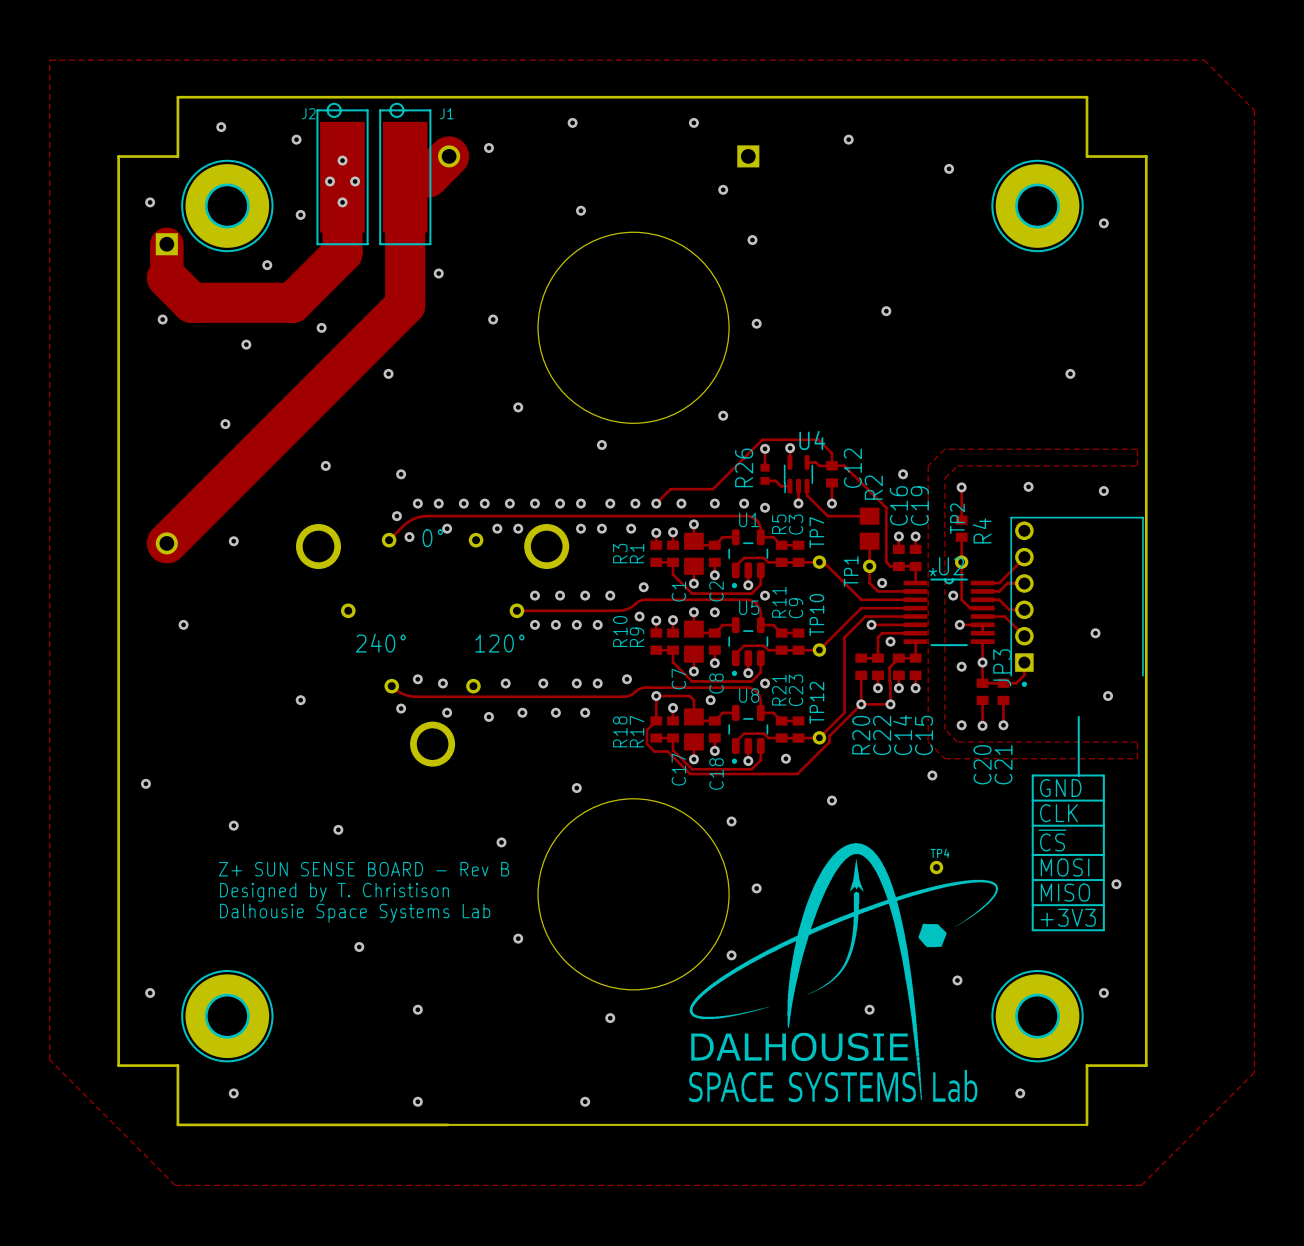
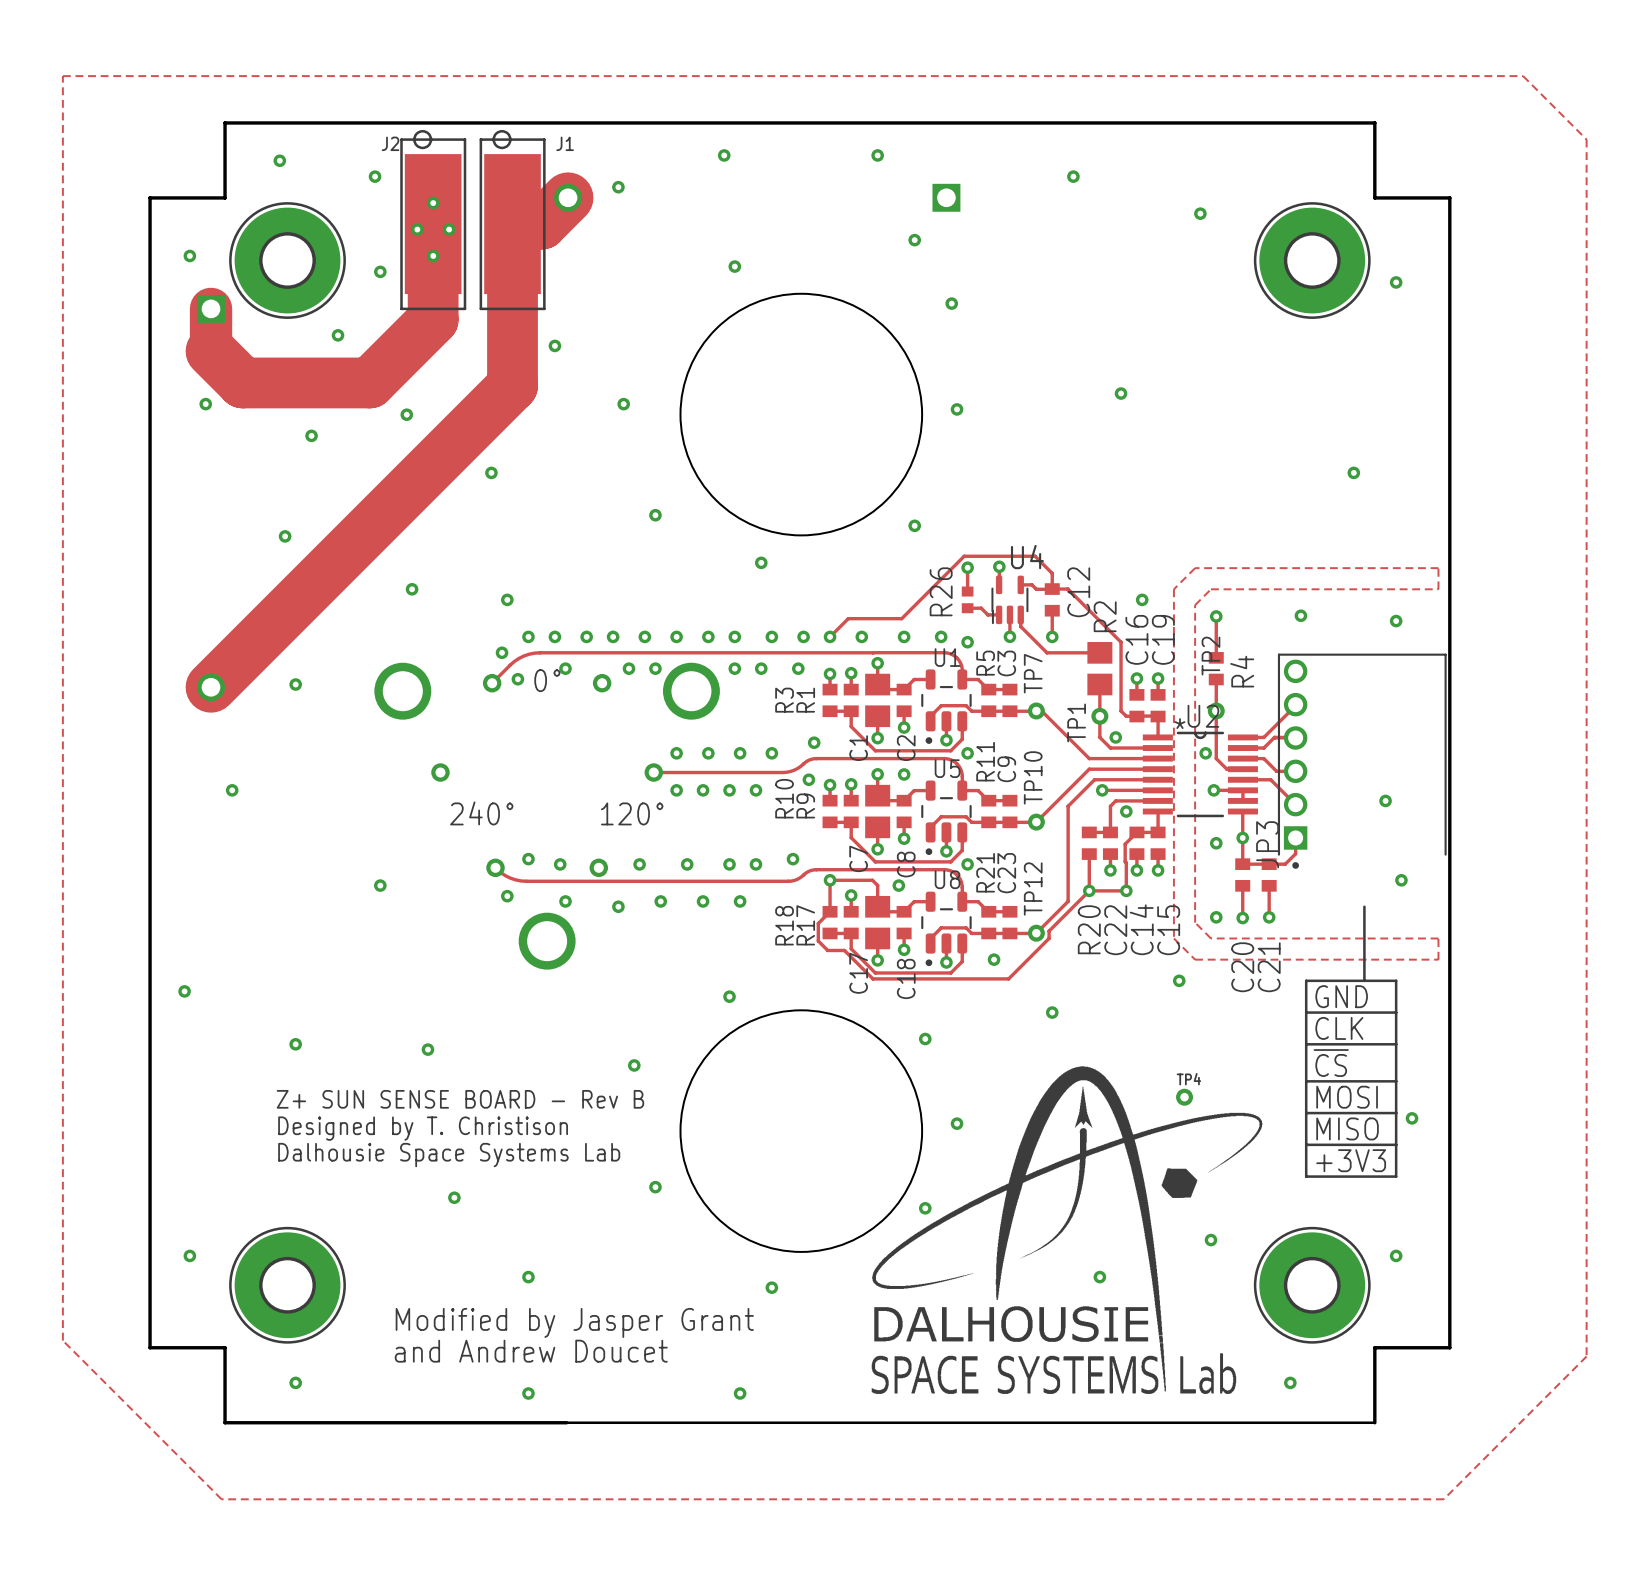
text: none -> Modified by Jasper Grant (574, 1322)
text: none -> and Andrew Doucet (531, 1351)

